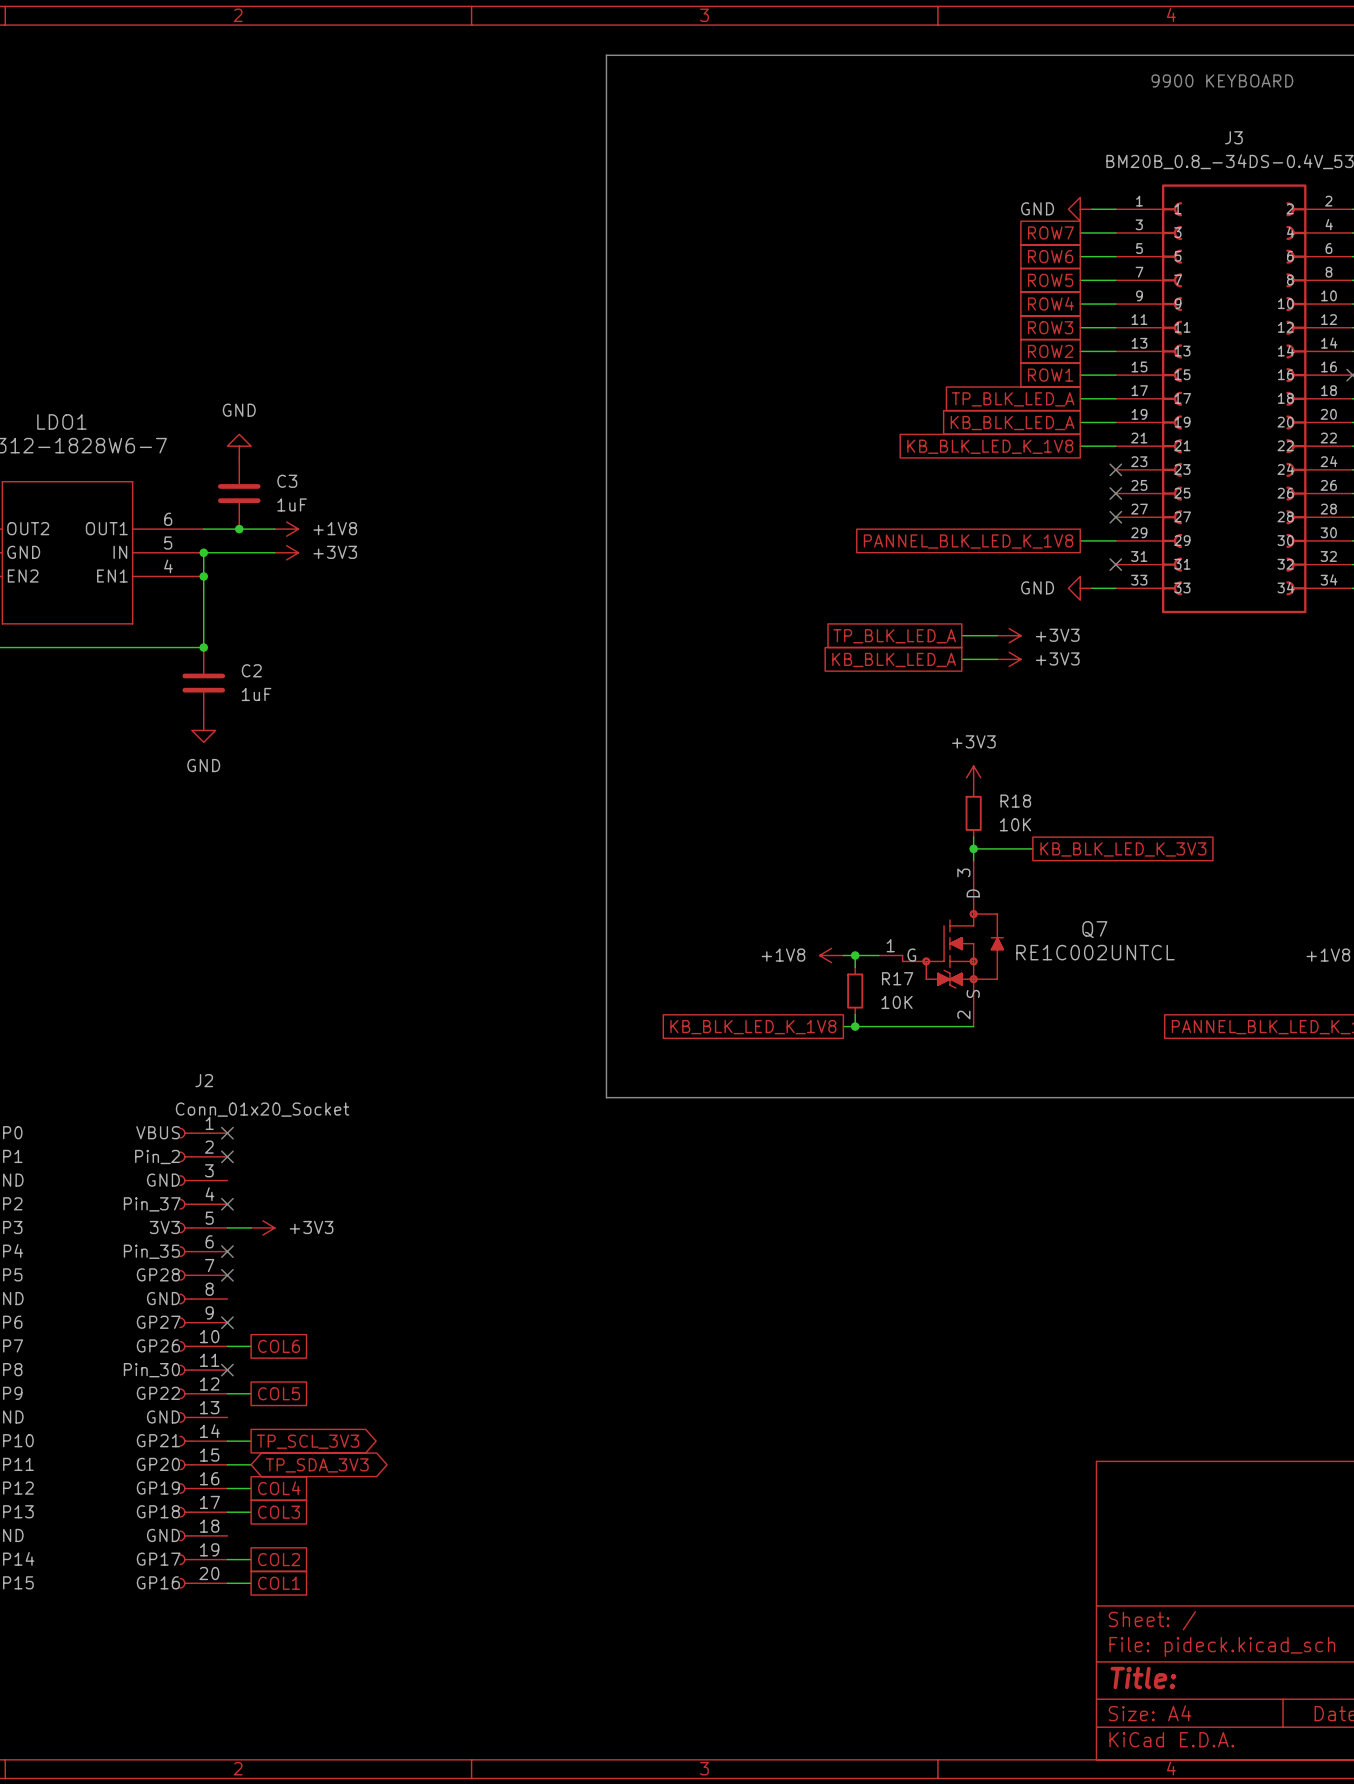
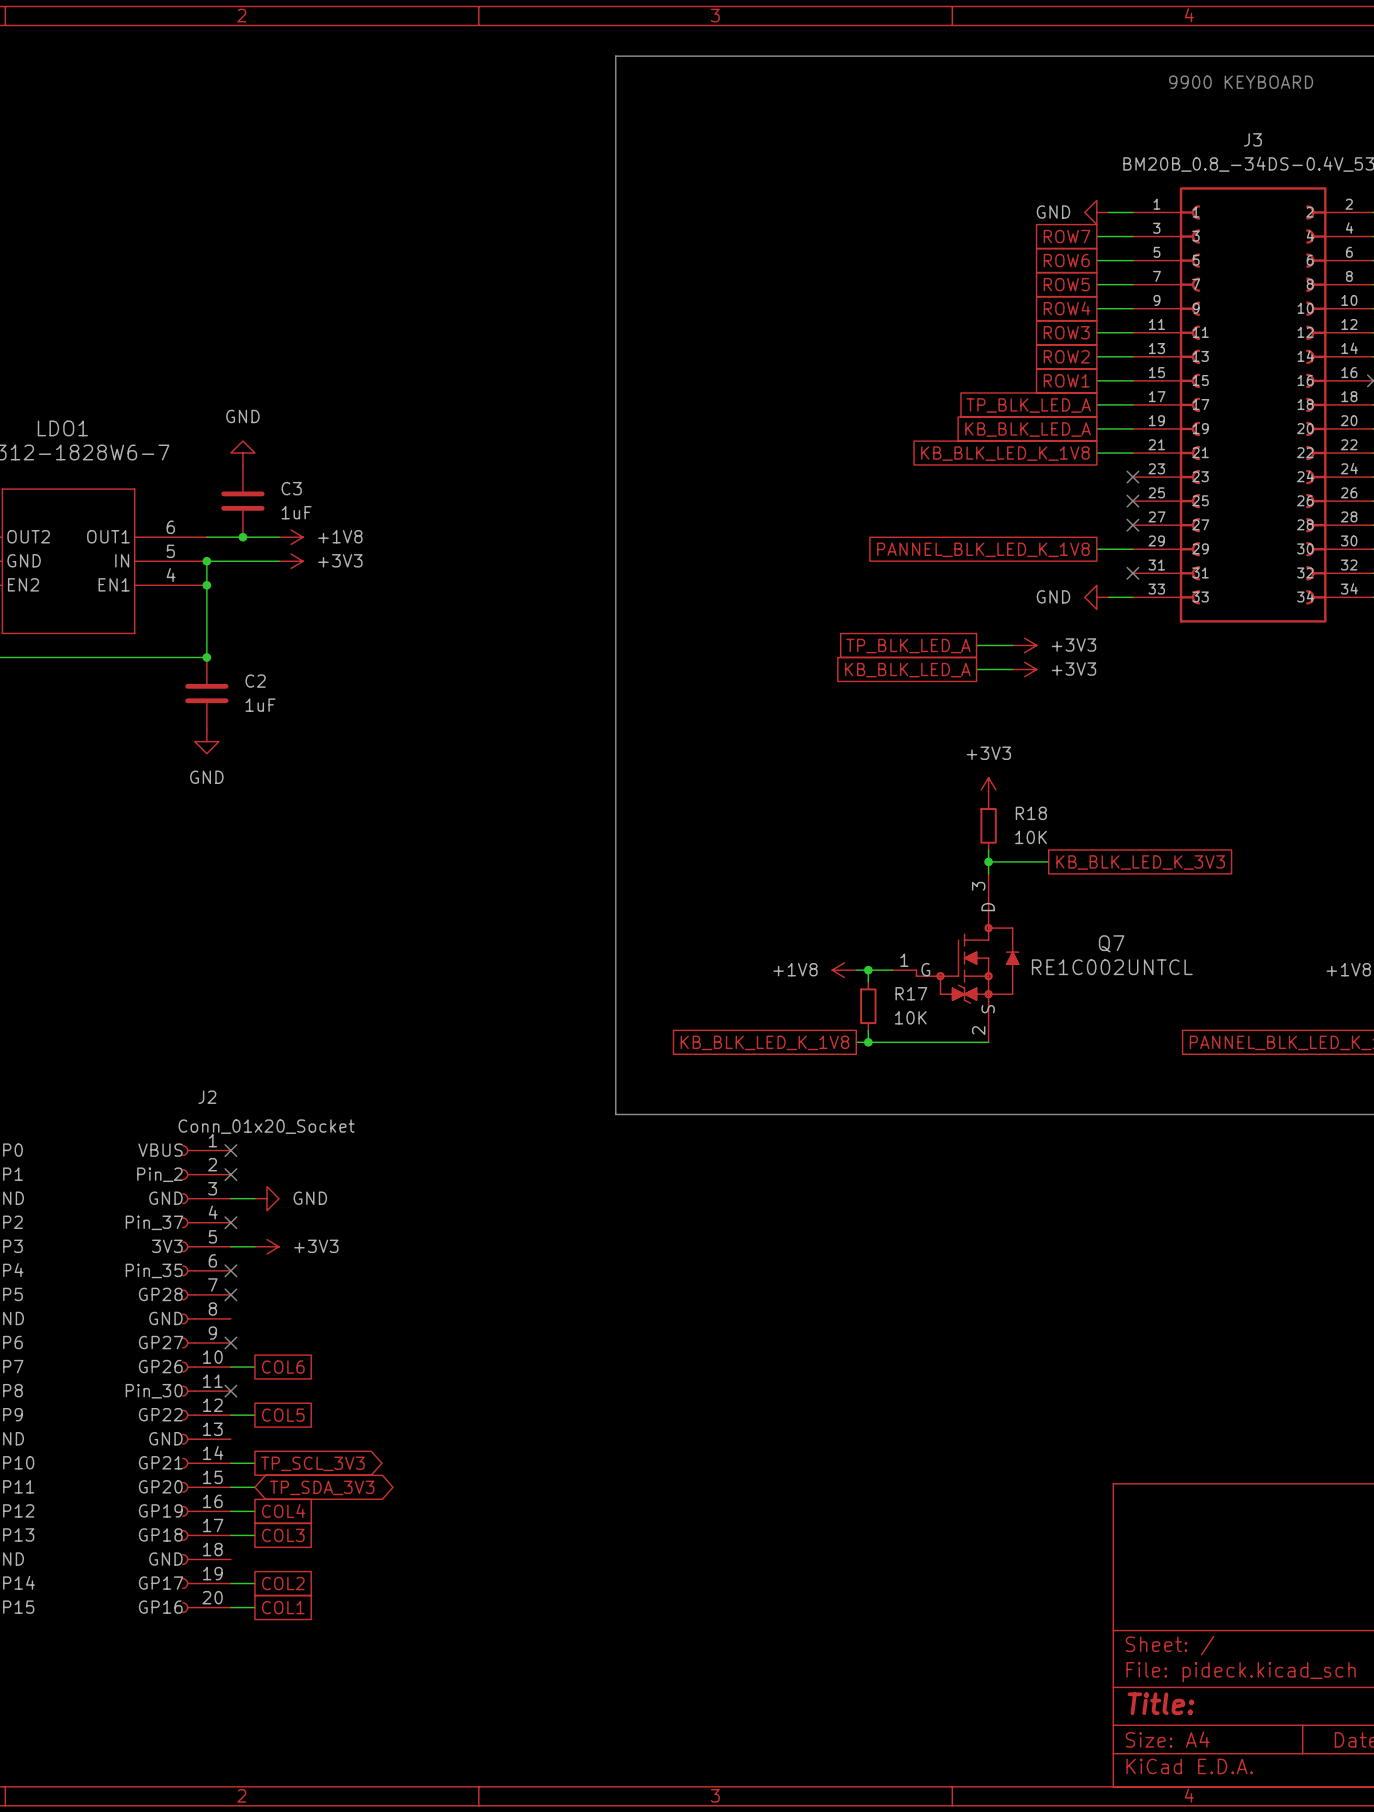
wire: none -> (230, 1198) (254, 1198)
power symbol: none -> GND (266, 1198)

